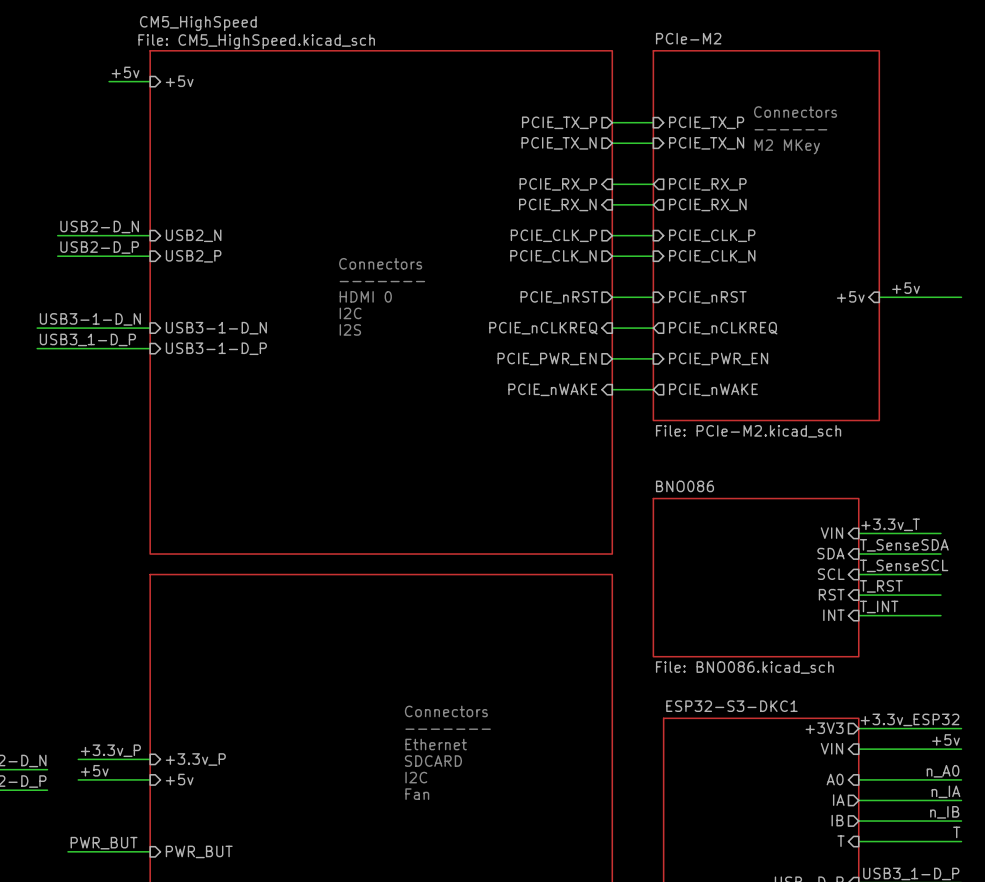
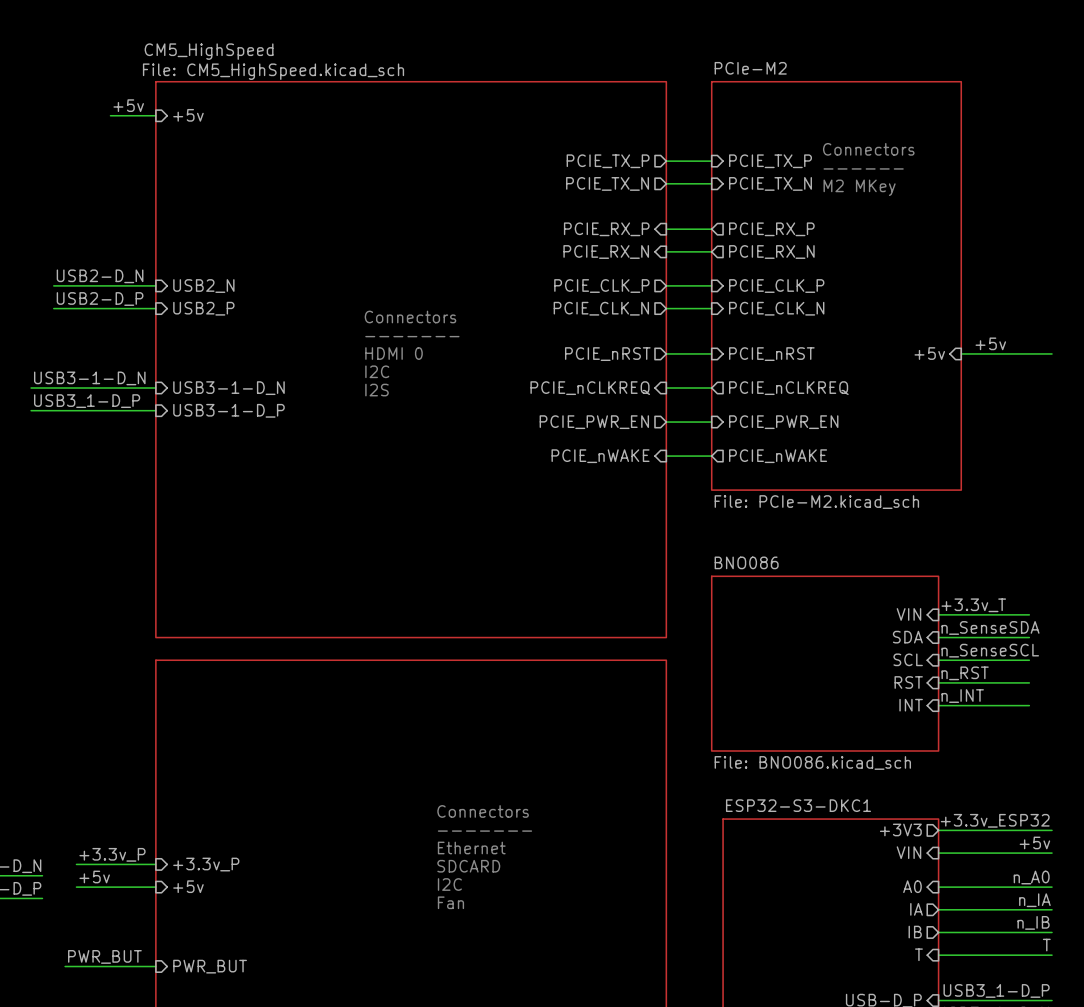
label: T_SenseSDA (904, 545) -> n_SenseSDA (990, 627)
label: T_SenseSCL (904, 565) -> n_SenseSCL (990, 650)
label: T_RST (881, 586) -> n_RST (965, 673)
label: T_INT (879, 606) -> n_INT (962, 696)

